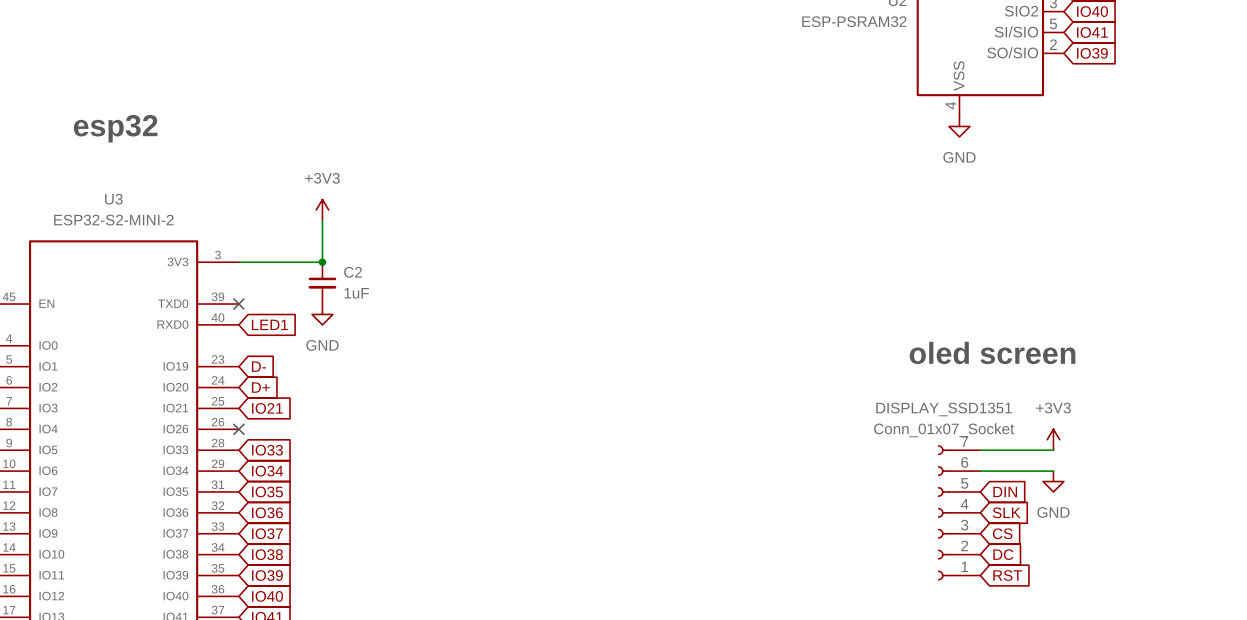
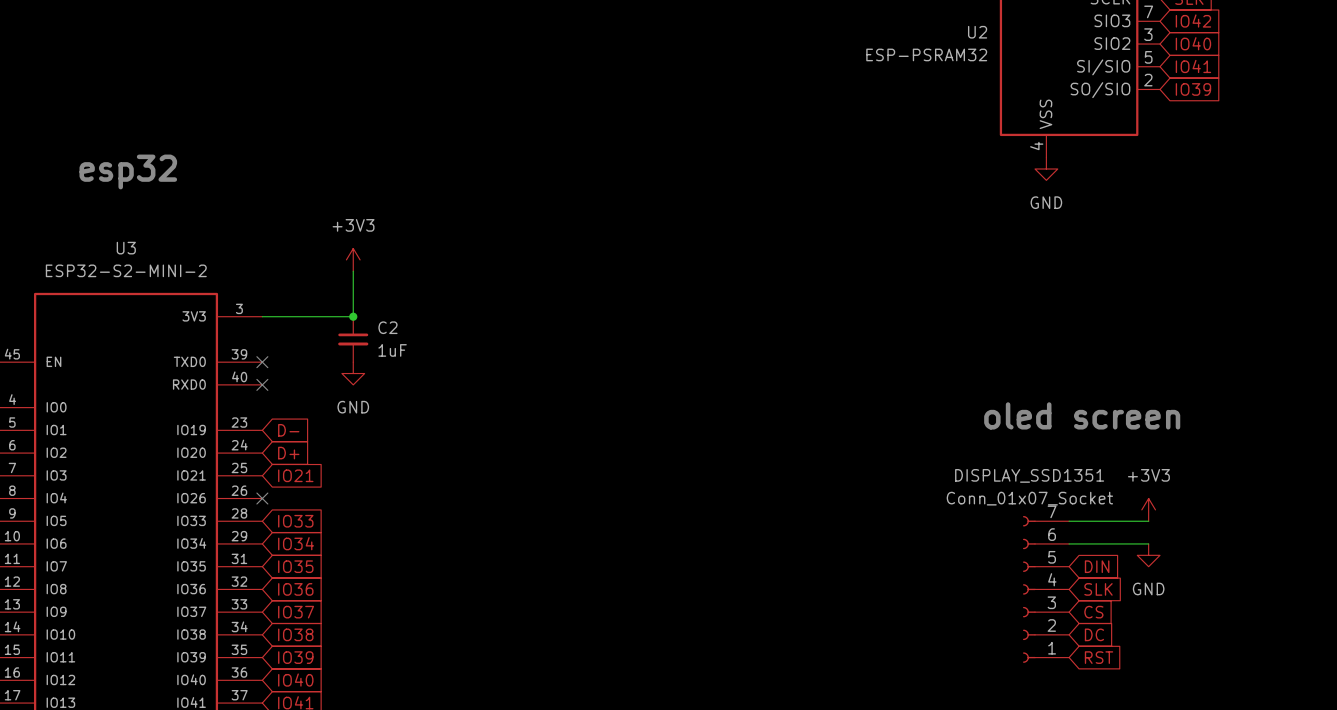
no-connect mark: none -> (262, 384)
global label: LED1 (269, 324) -> none

